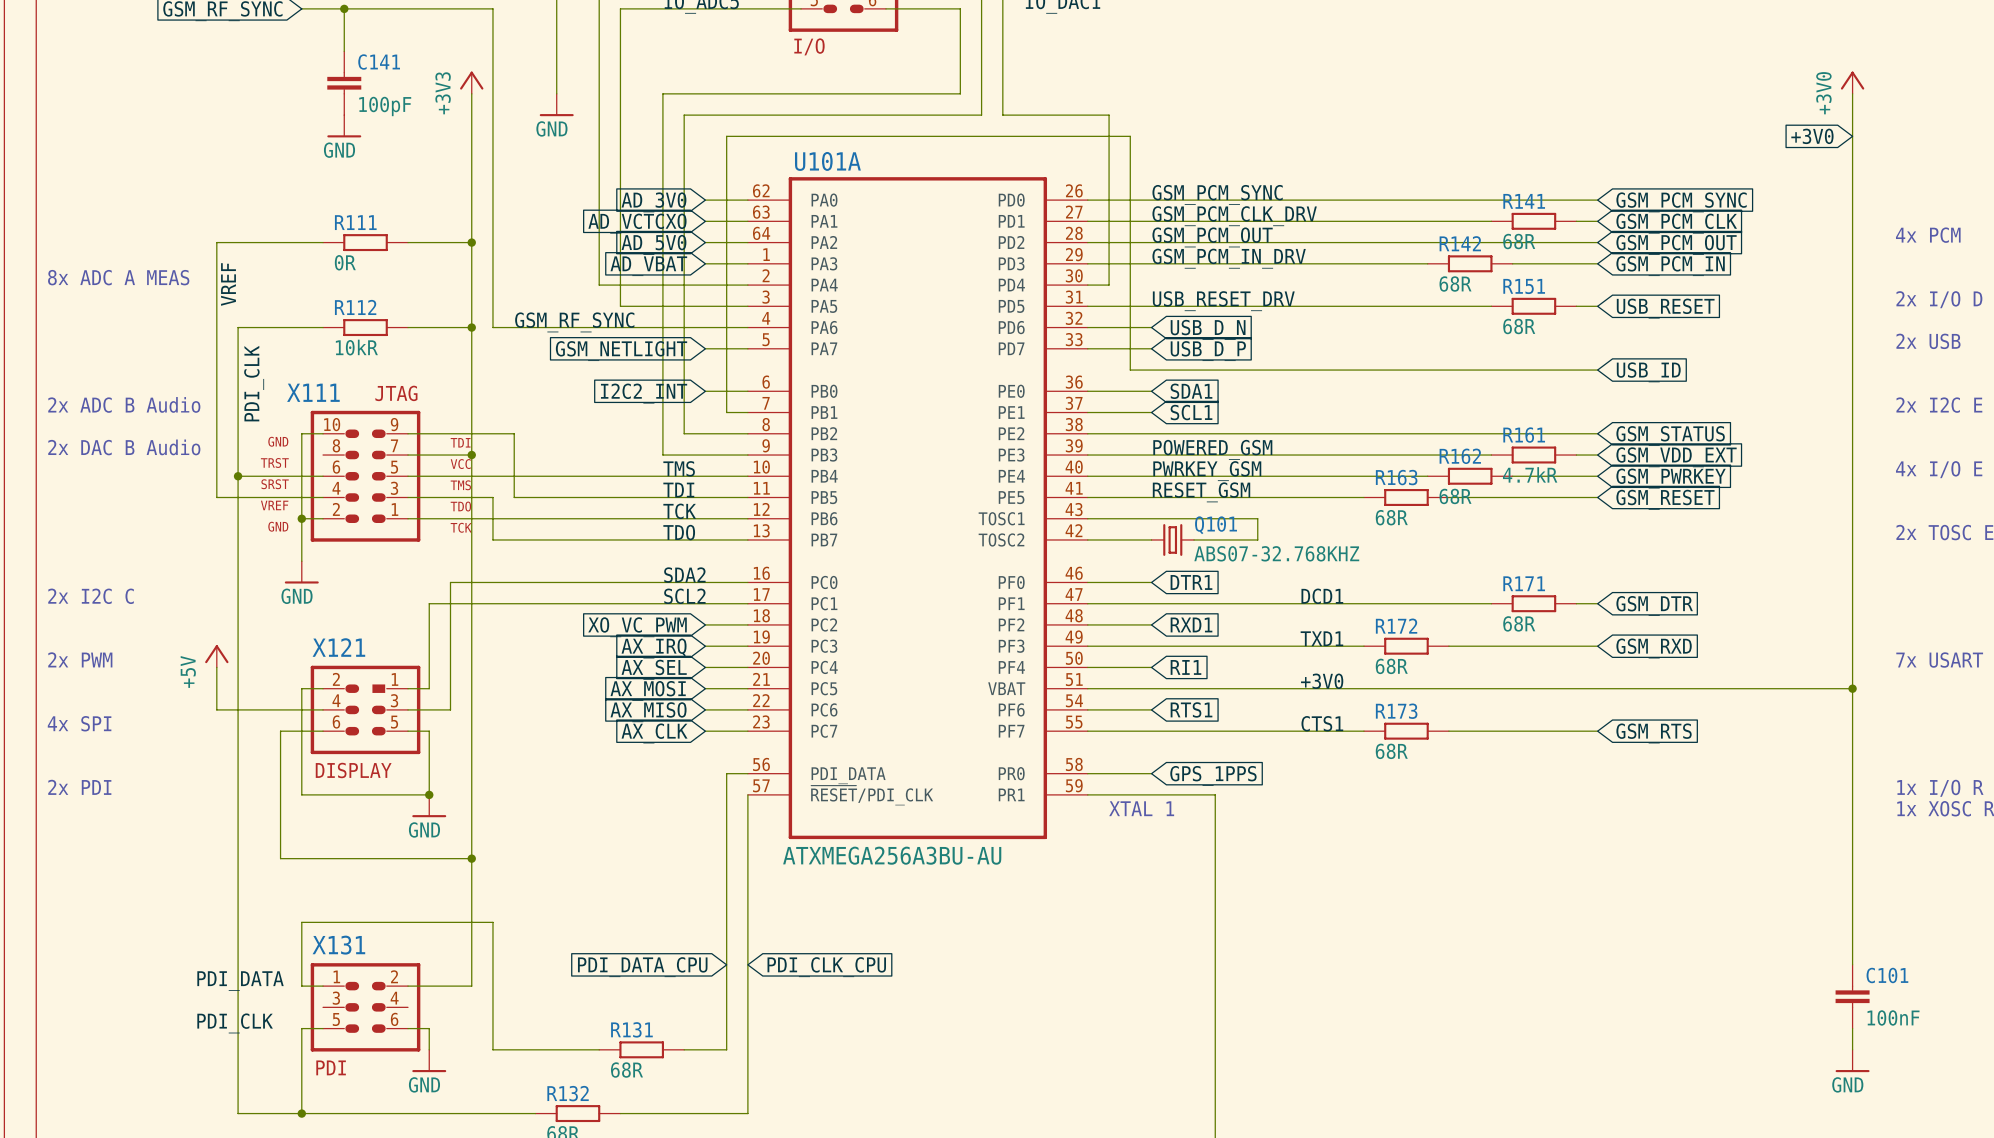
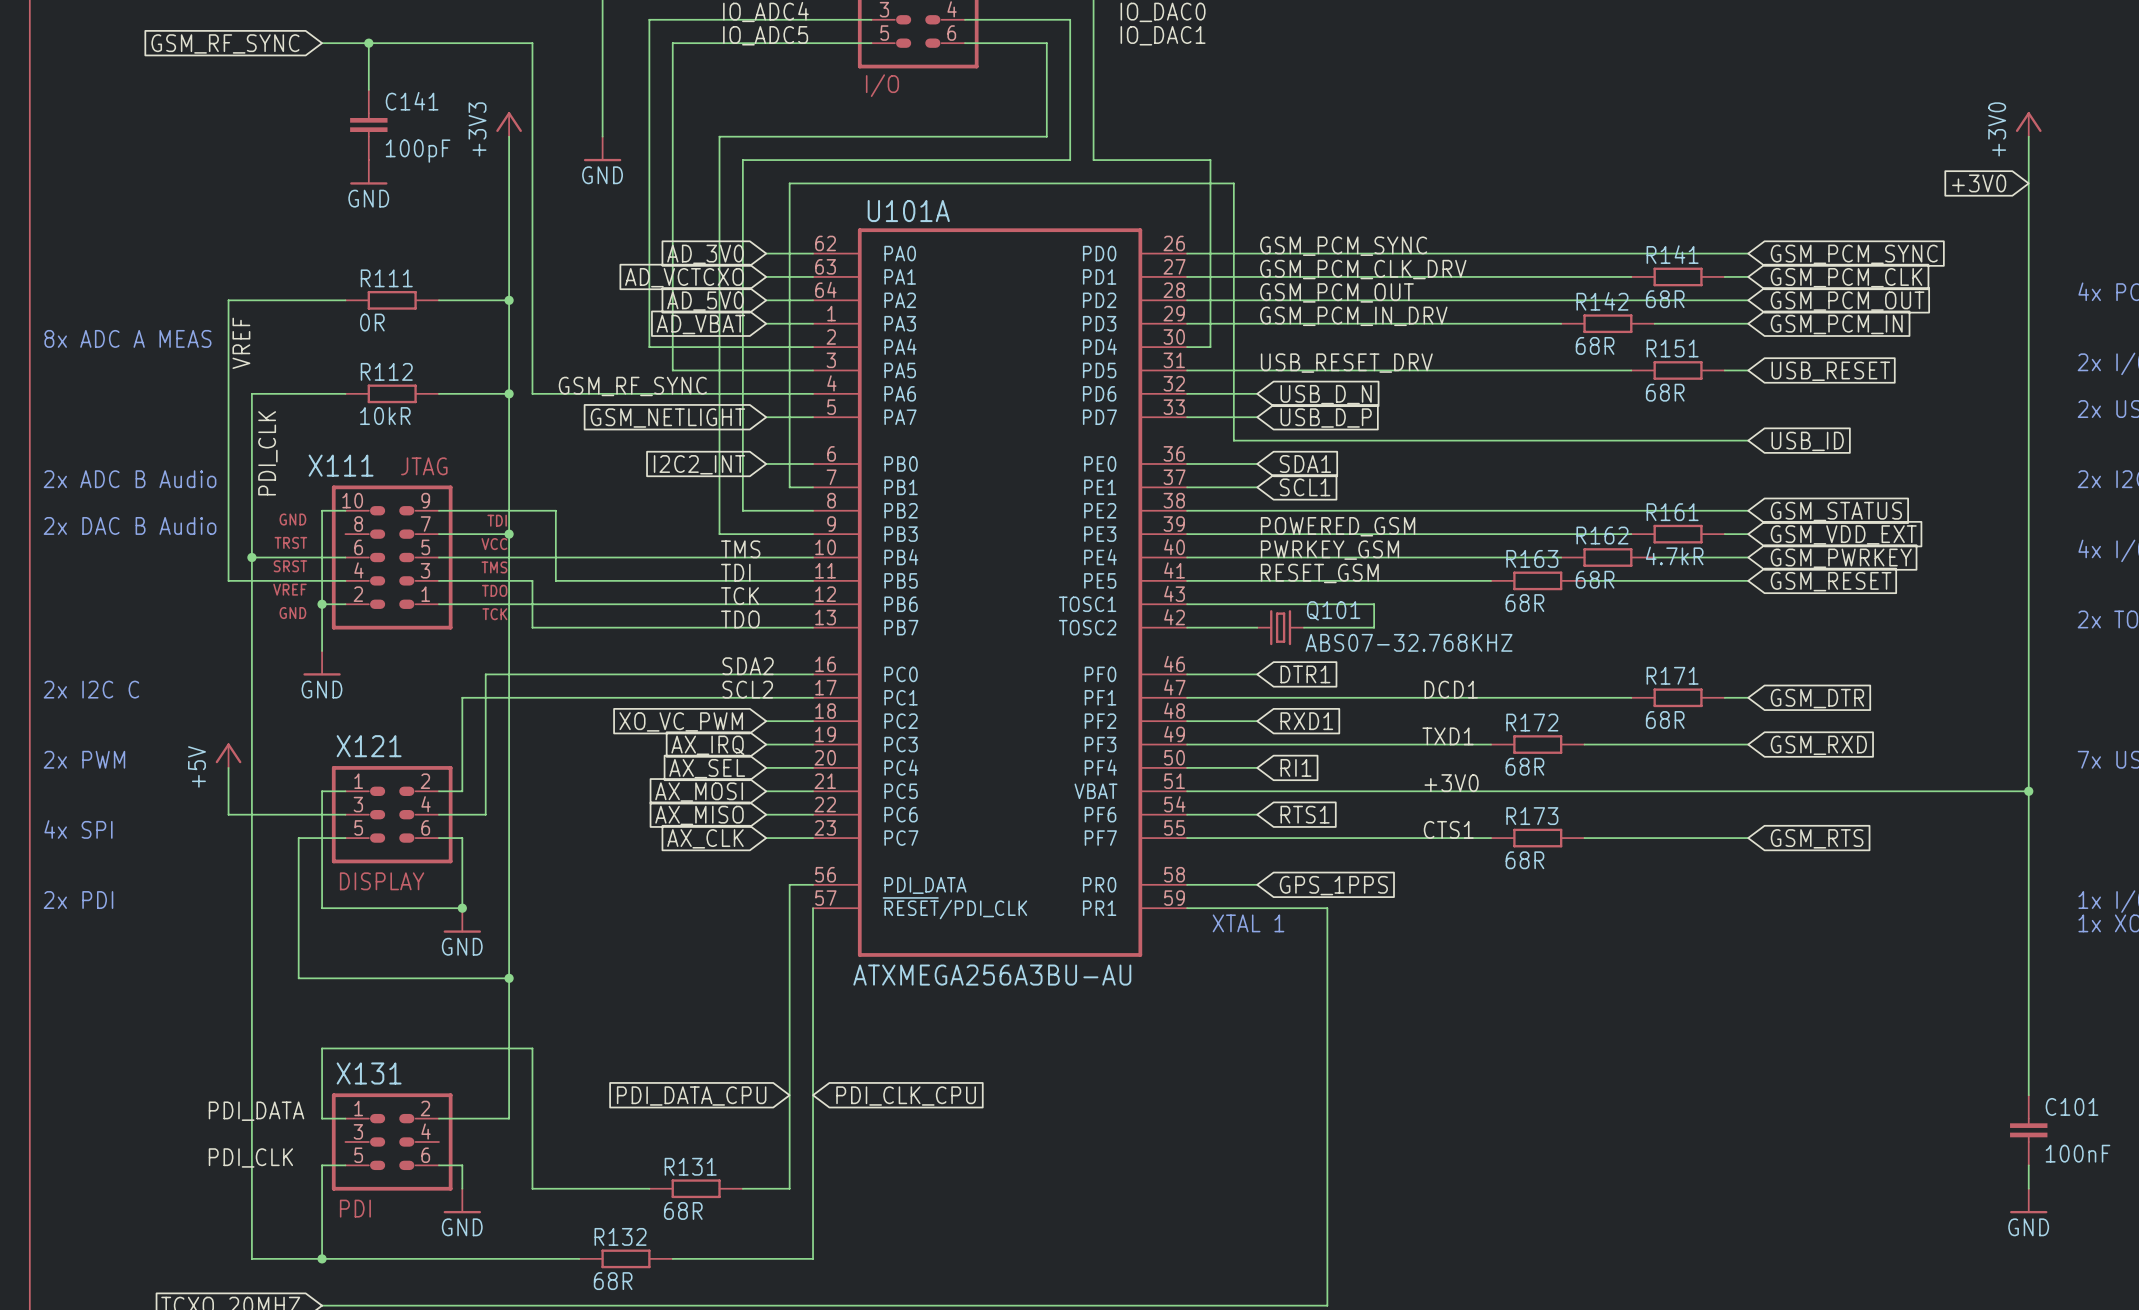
X121 symbol: [310, 665, 421, 755] -> [331, 766, 453, 864]

